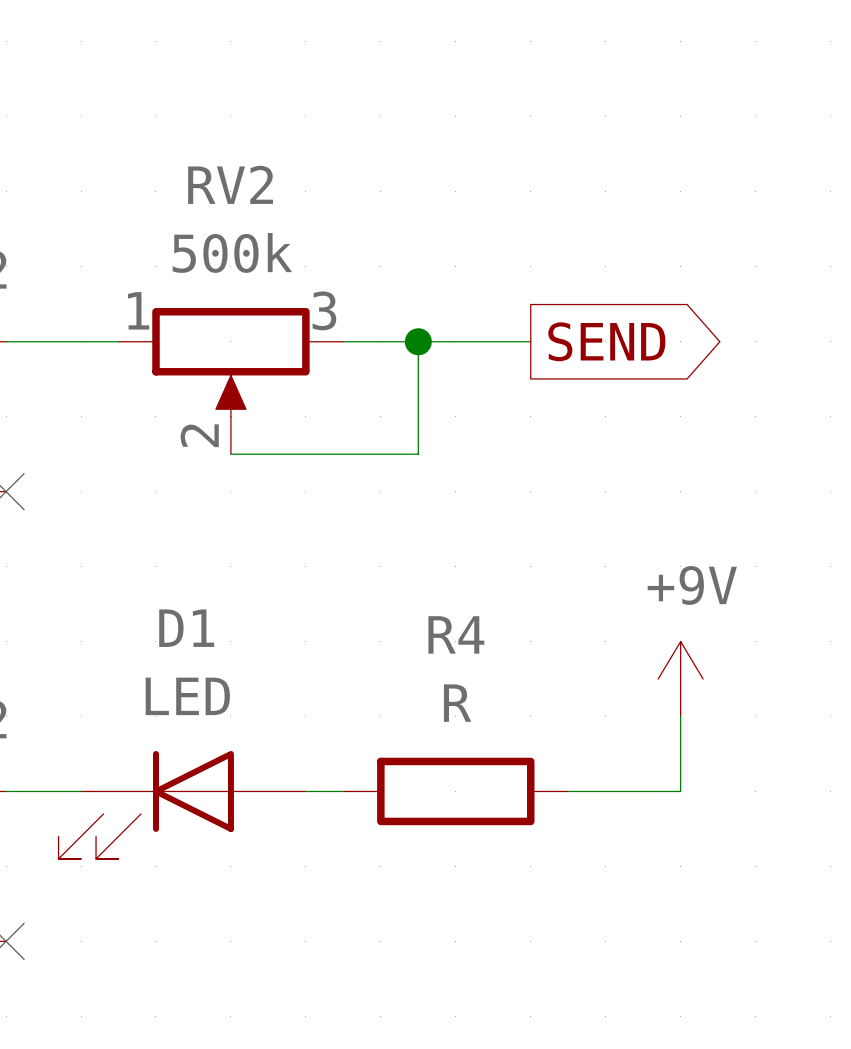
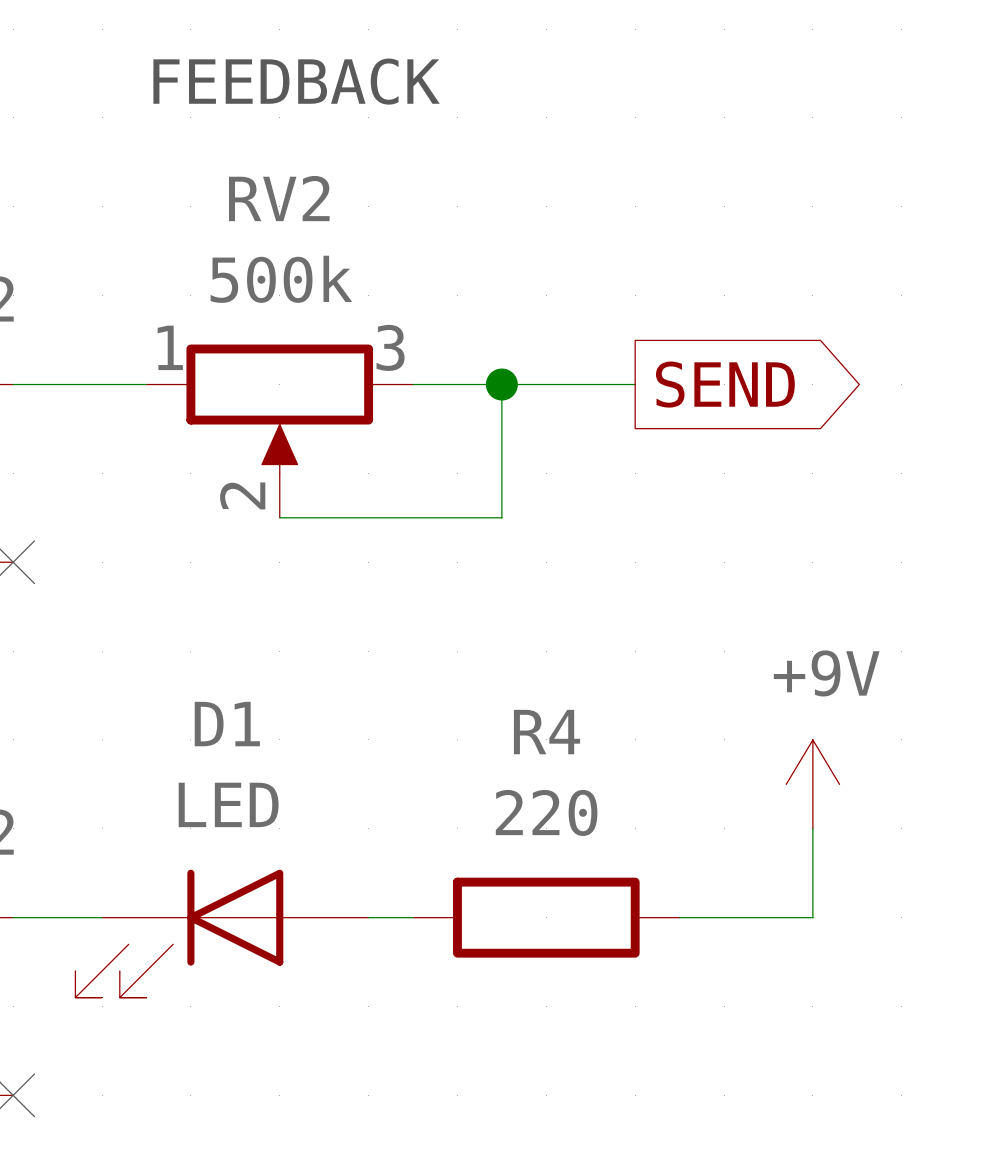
text: none -> FEEDBACK (296, 81)
R4 value: R (457, 703) -> 220 (546, 812)

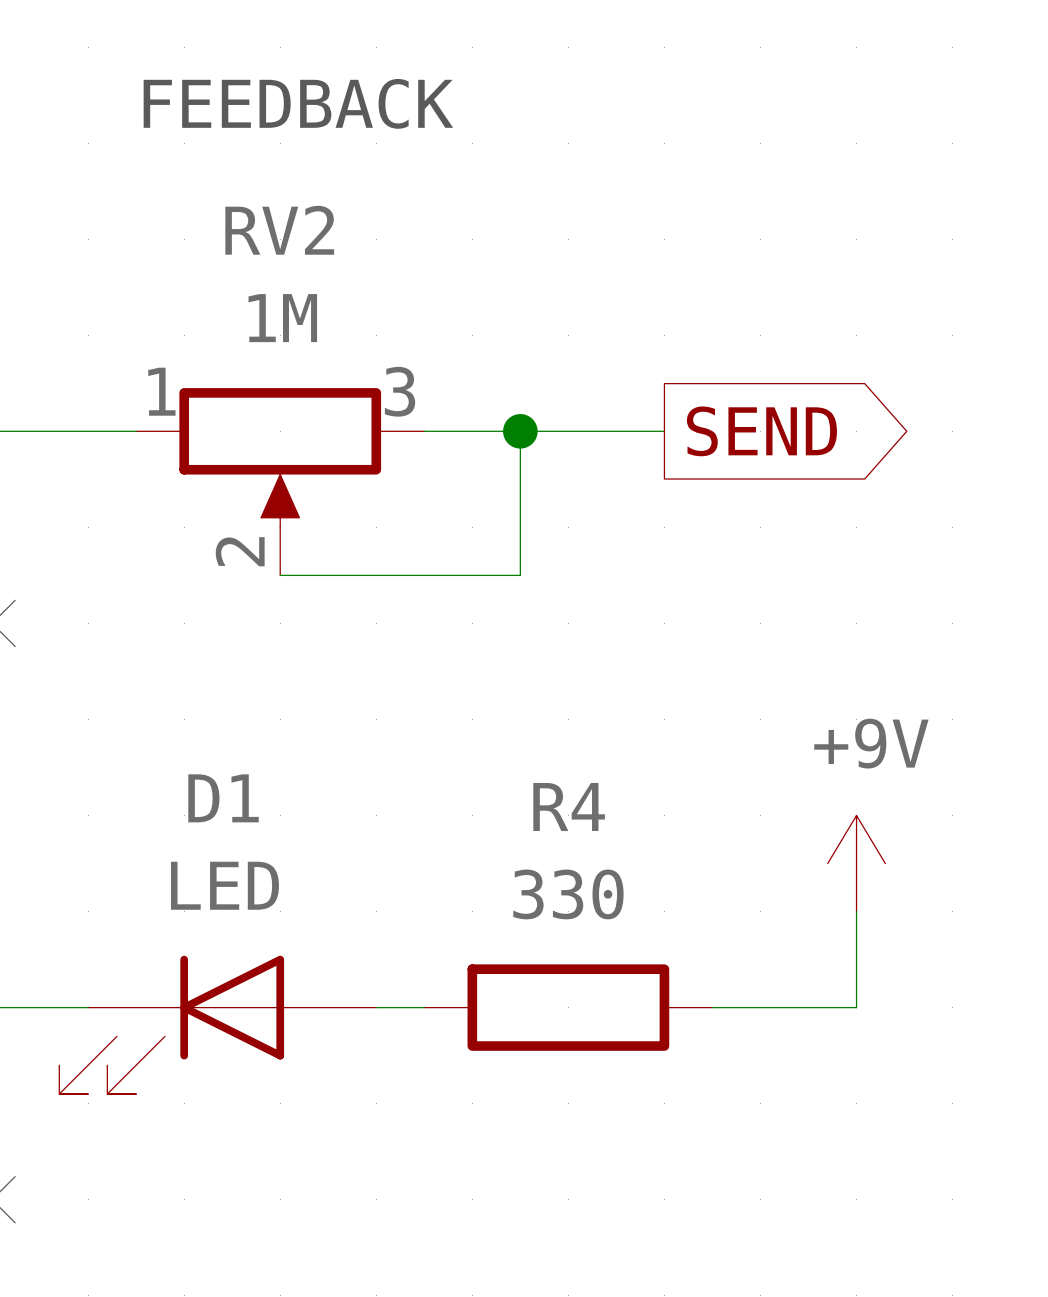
RV2 value: 500k (281, 279) -> 1M (282, 318)
R4 value: 220 (546, 812) -> 330 (568, 894)

